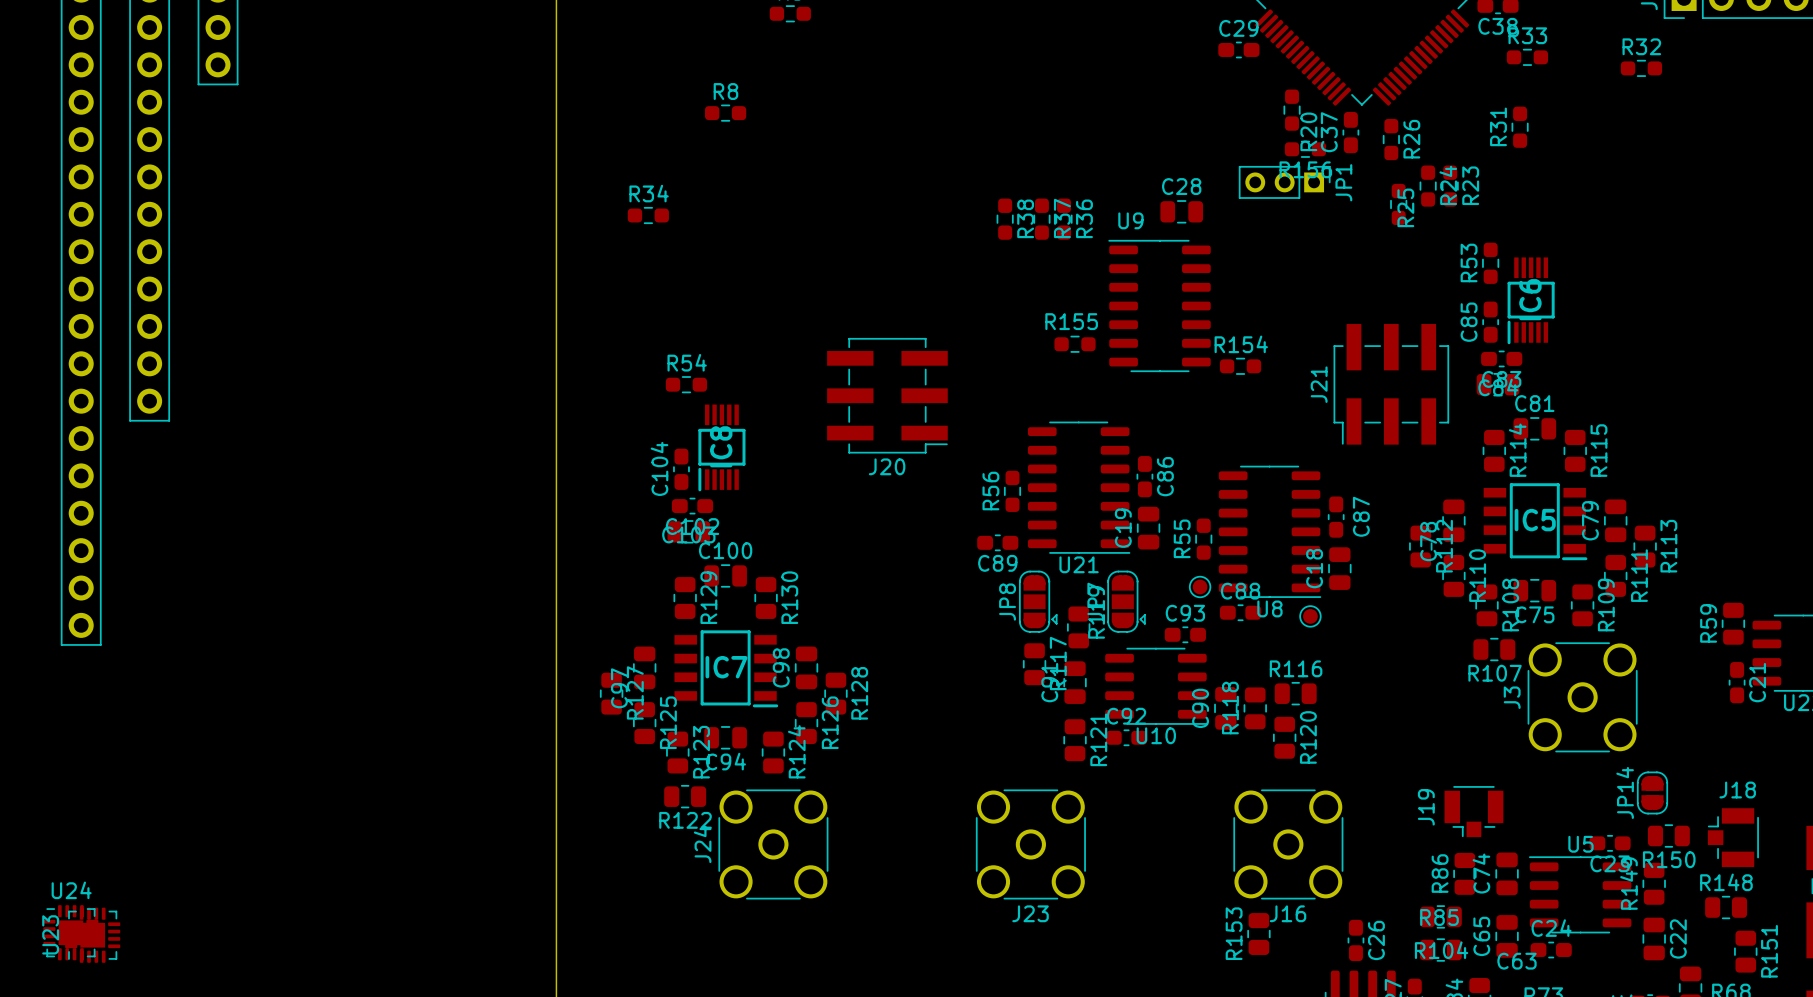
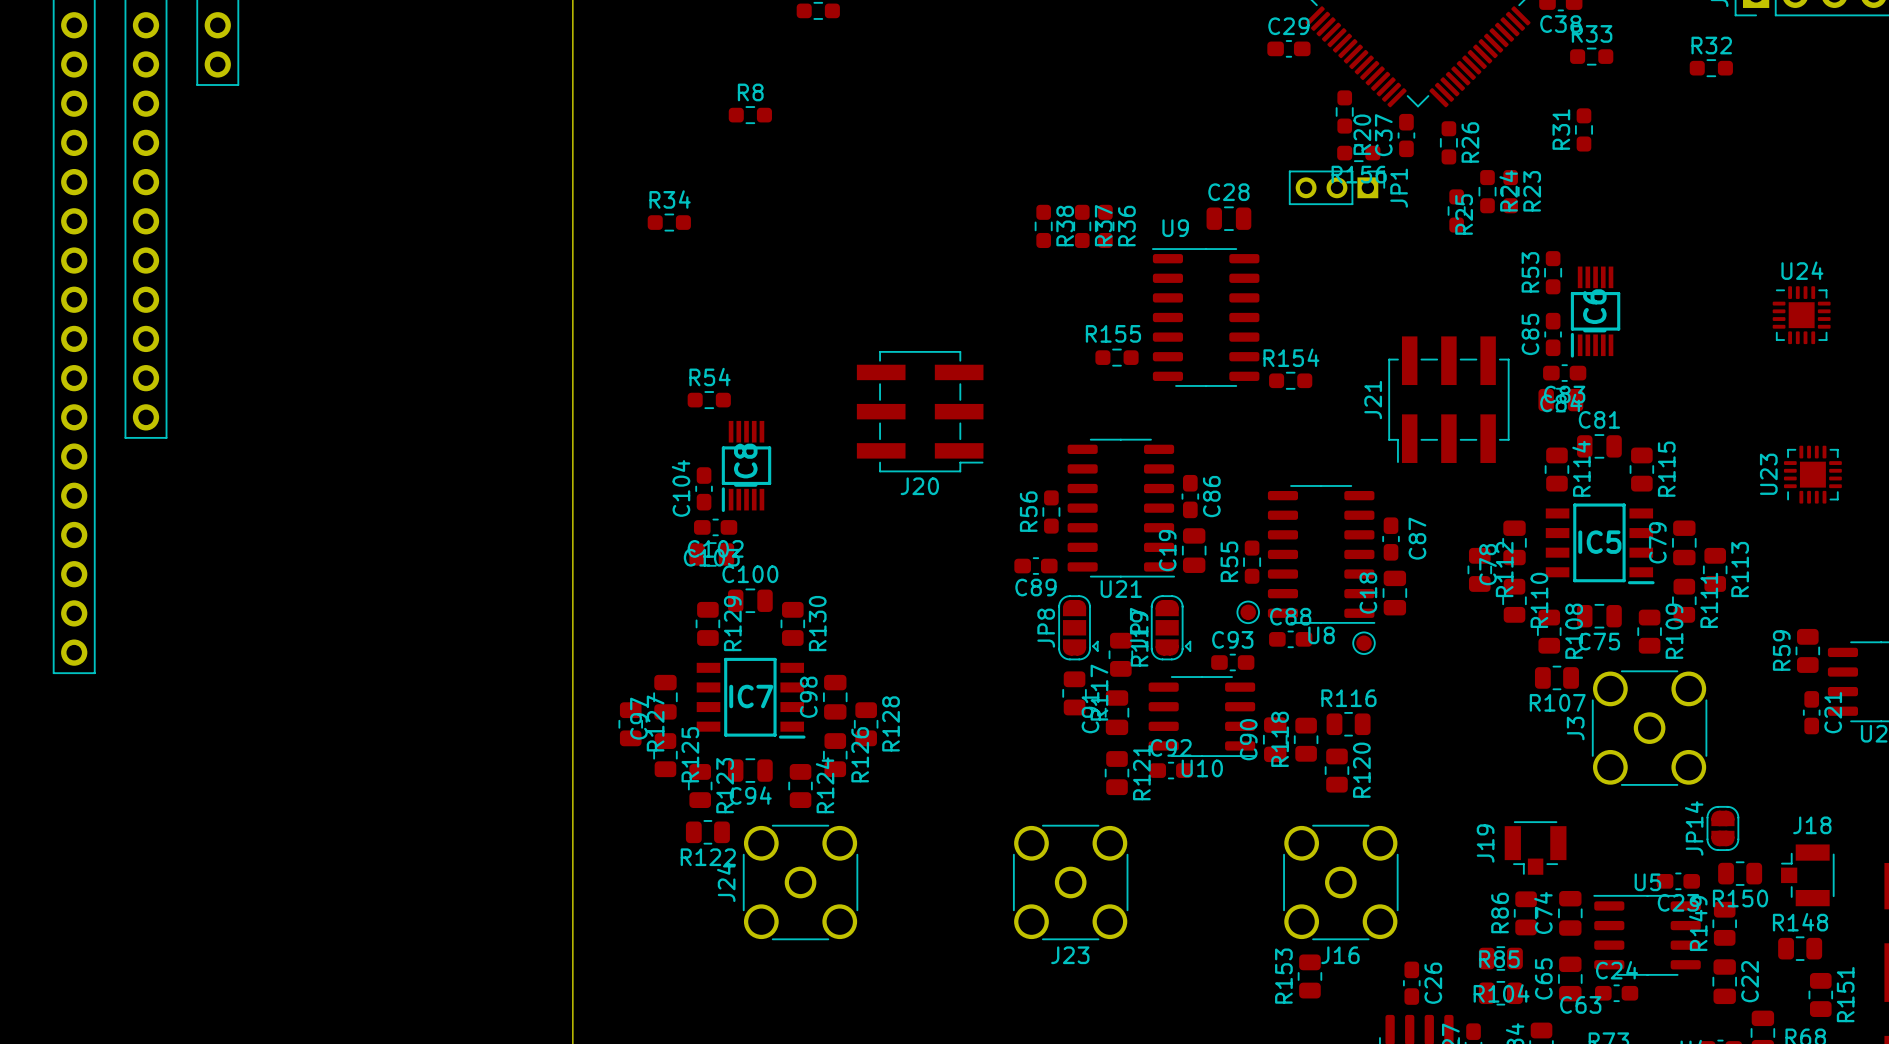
U24 position: (70, 932) -> (1801, 315)
U23 position: (92, 935) -> (1812, 474)

